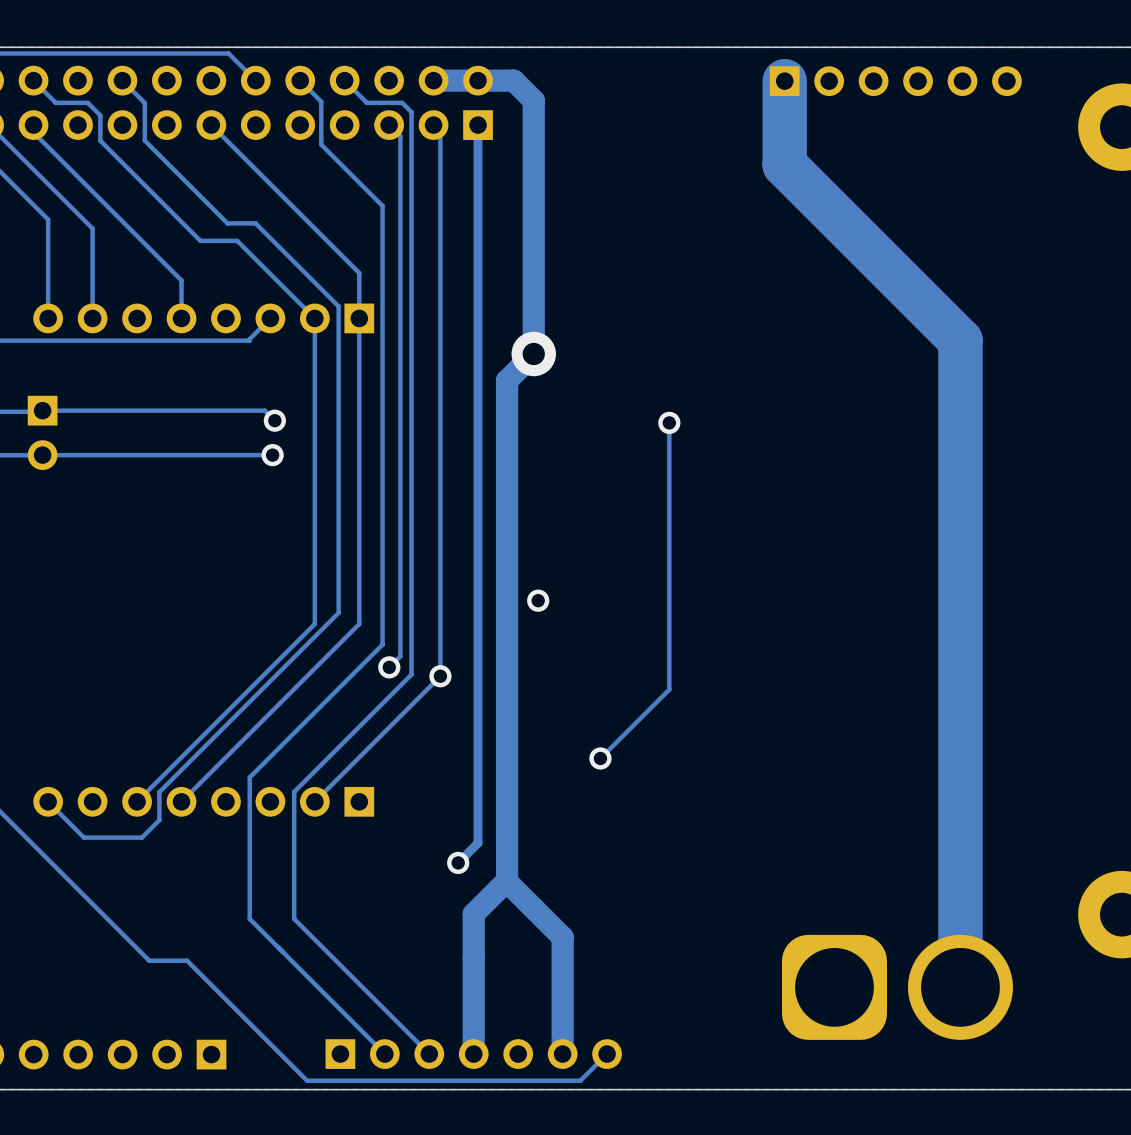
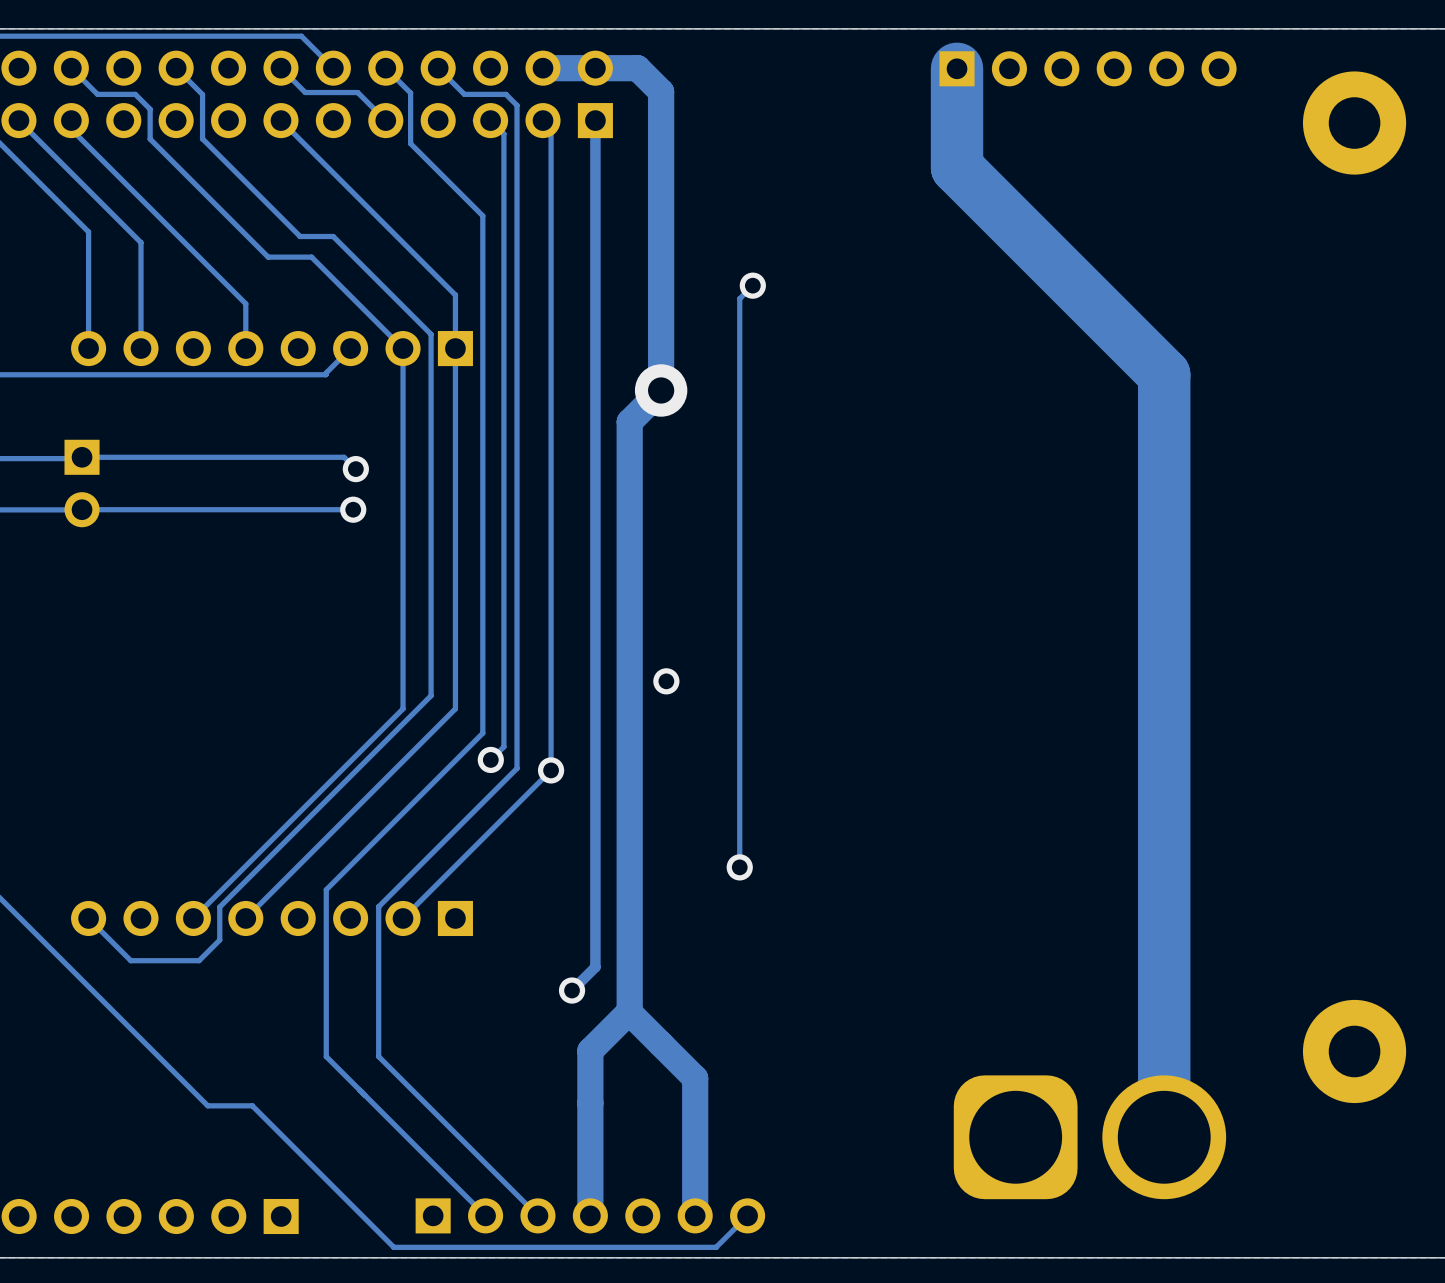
track: none -> (280, 68) (305, 92) (357, 92) (385, 120)
via: none -> (752, 285)
track: (669, 422) (669, 689) (600, 758) -> (752, 285) (739, 298) (739, 867)
via: (669, 422) -> none

